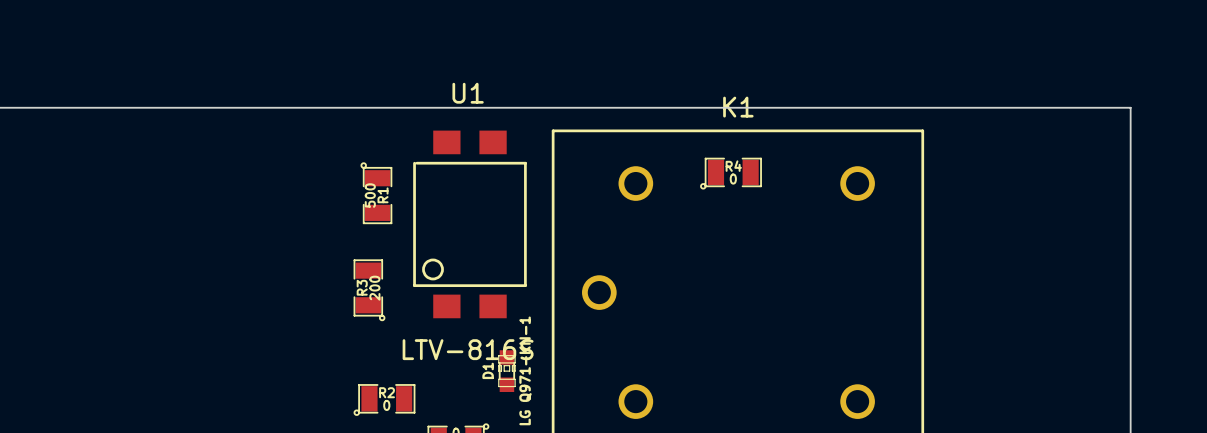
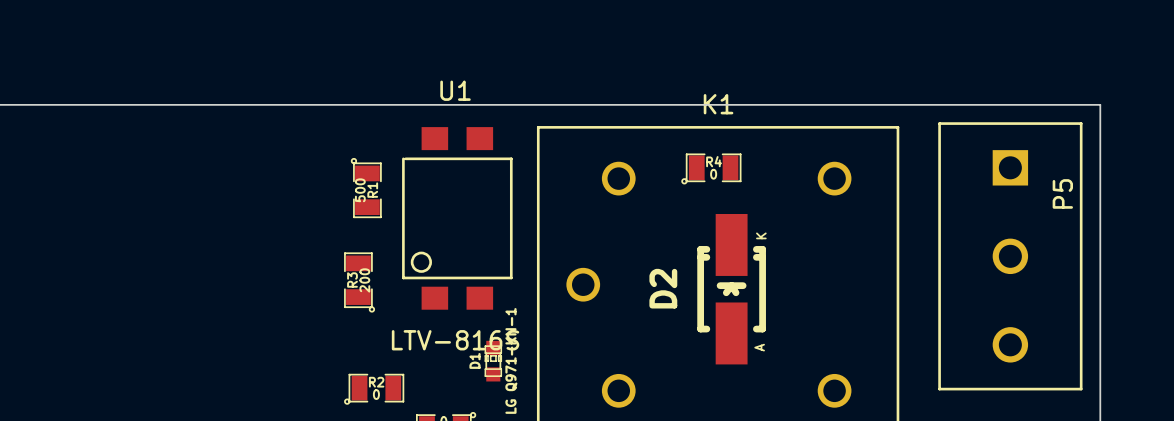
P5: none -> (1010, 256)
D2: none -> (731, 289)

